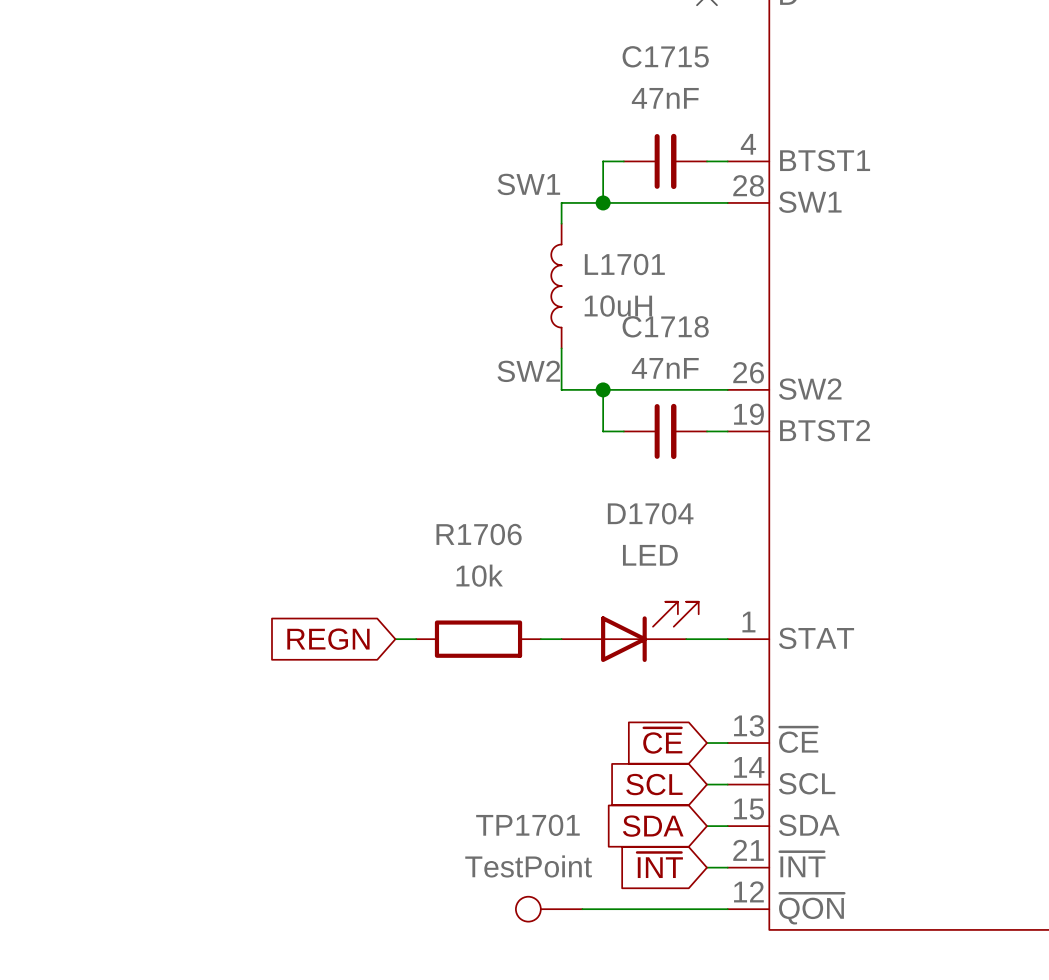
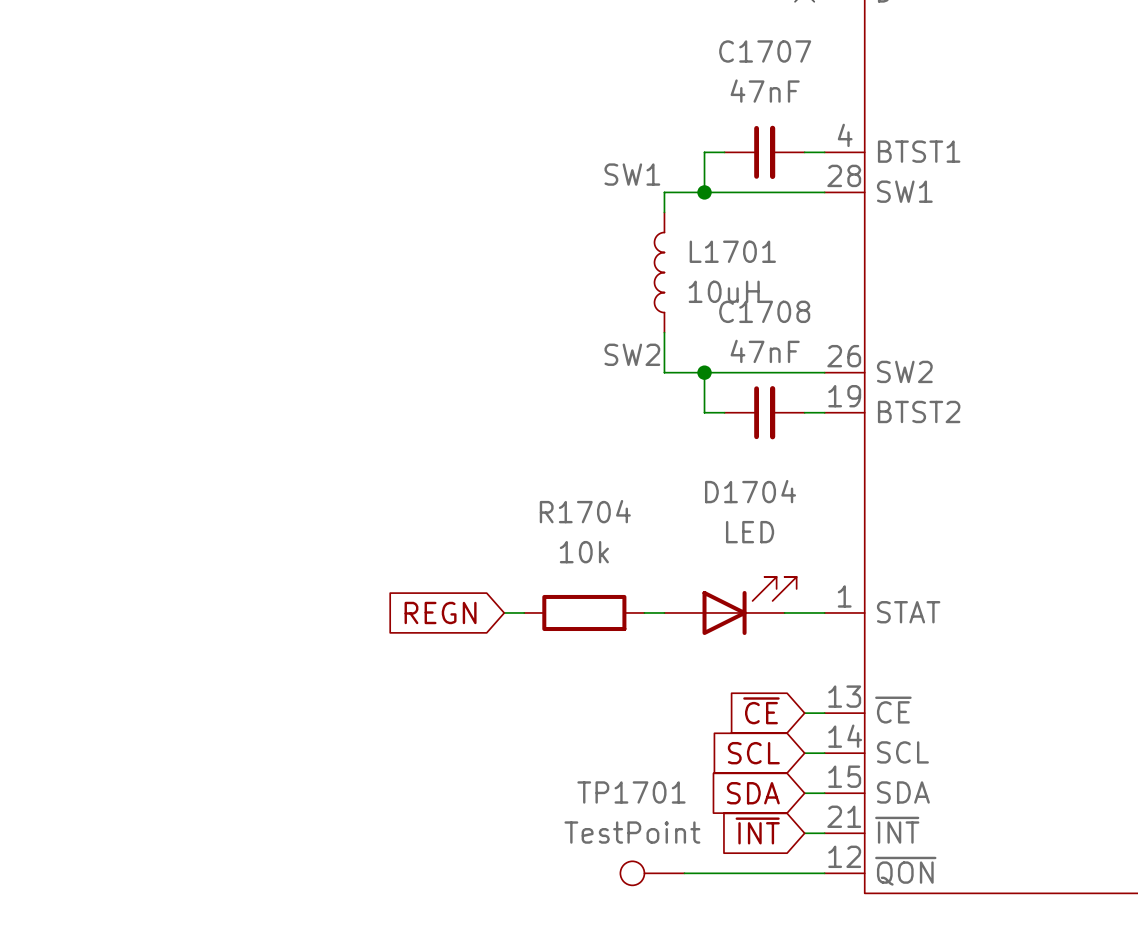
C1715 name: C1715 (665, 56) -> C1707 (765, 51)
C1718 name: C1718 (665, 326) -> C1708 (764, 311)
R1706 name: R1706 (479, 534) -> R1704 (585, 511)

